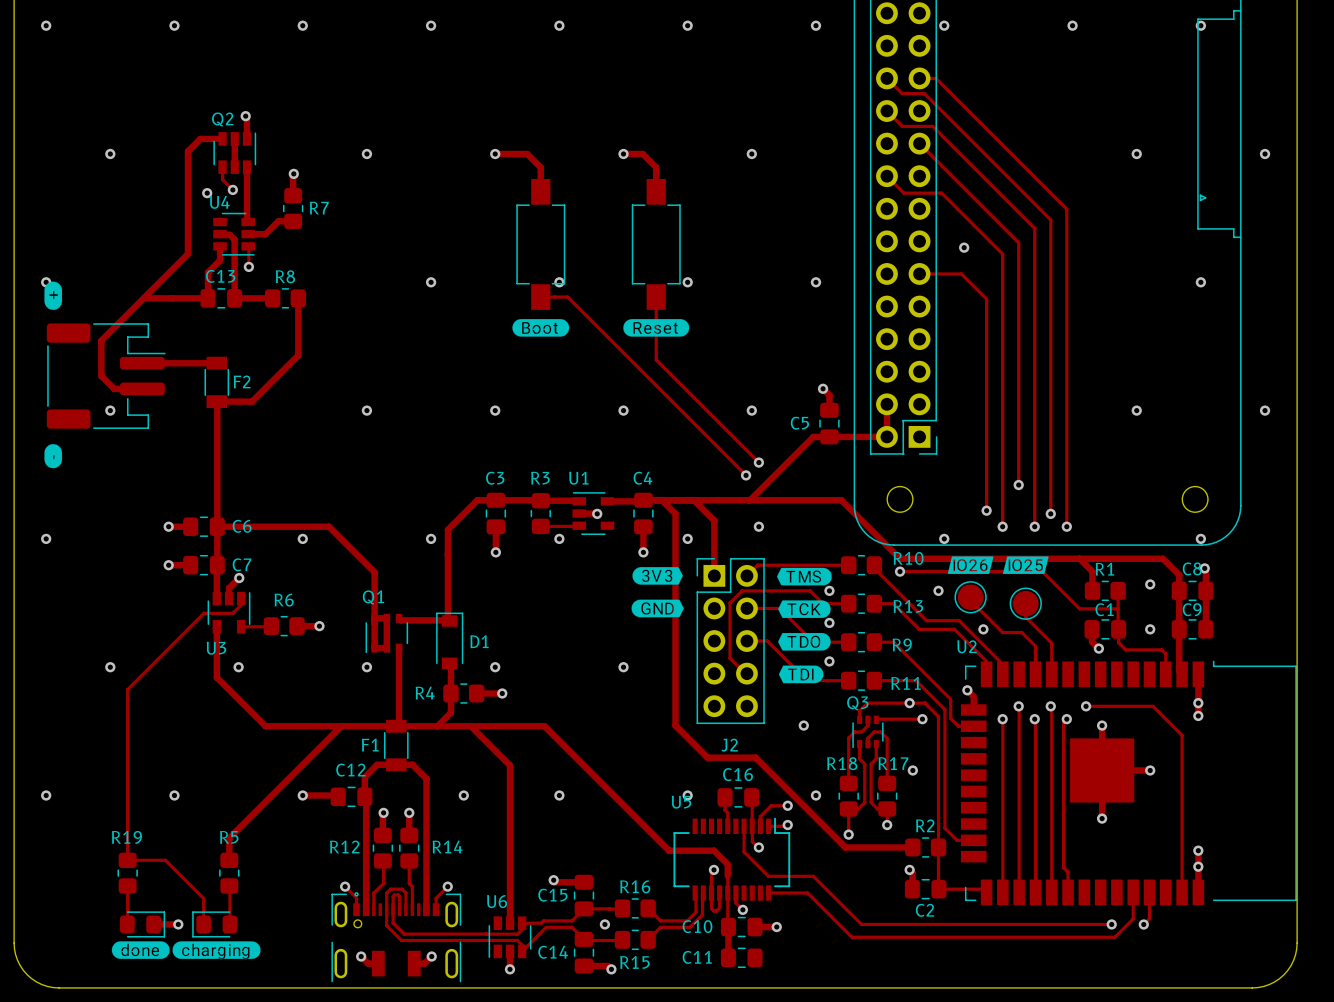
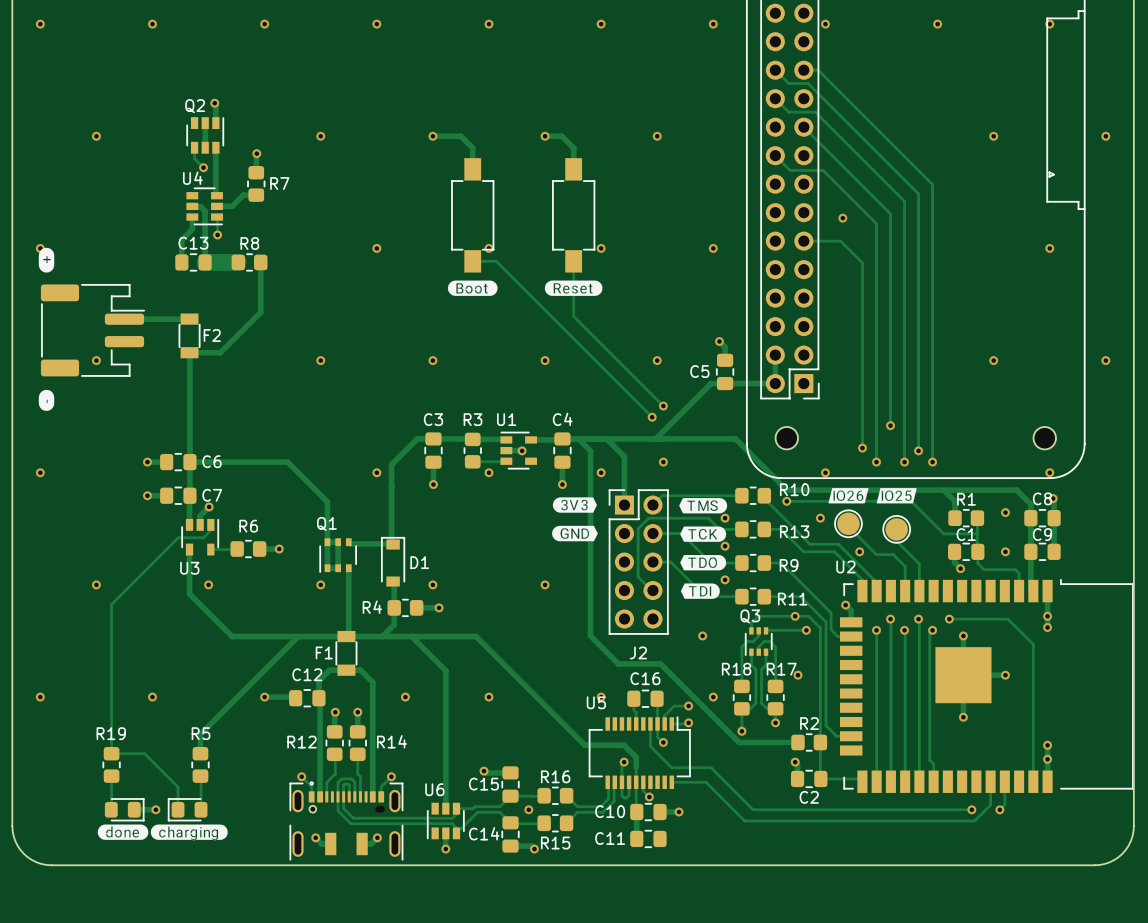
track: (222, 138) (200, 138) (187, 151) (187, 254) (101, 340) (101, 375) (114, 388) (142, 388) -> none
via: (207, 193) -> none
track: (143, 298) (208, 298) -> none
track width: thin (234, 298) (272, 298) -> thick (205, 262) (238, 262)
via: (302, 538) -> none

